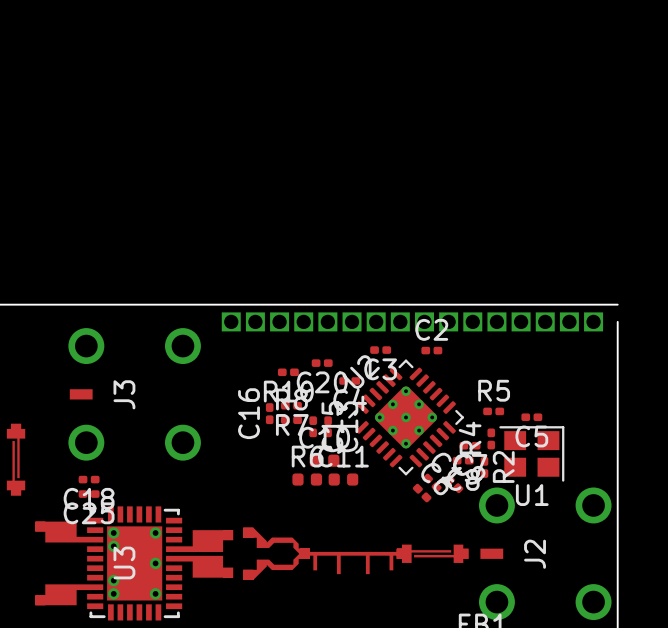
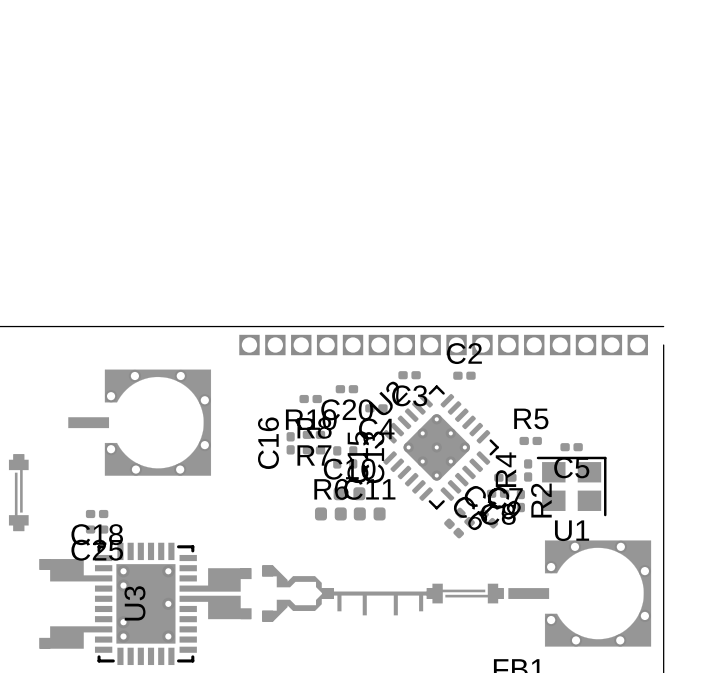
part: none -> (139, 422)
J3: (134, 394) -> none
part: none -> (579, 593)
J2: (545, 553) -> none

